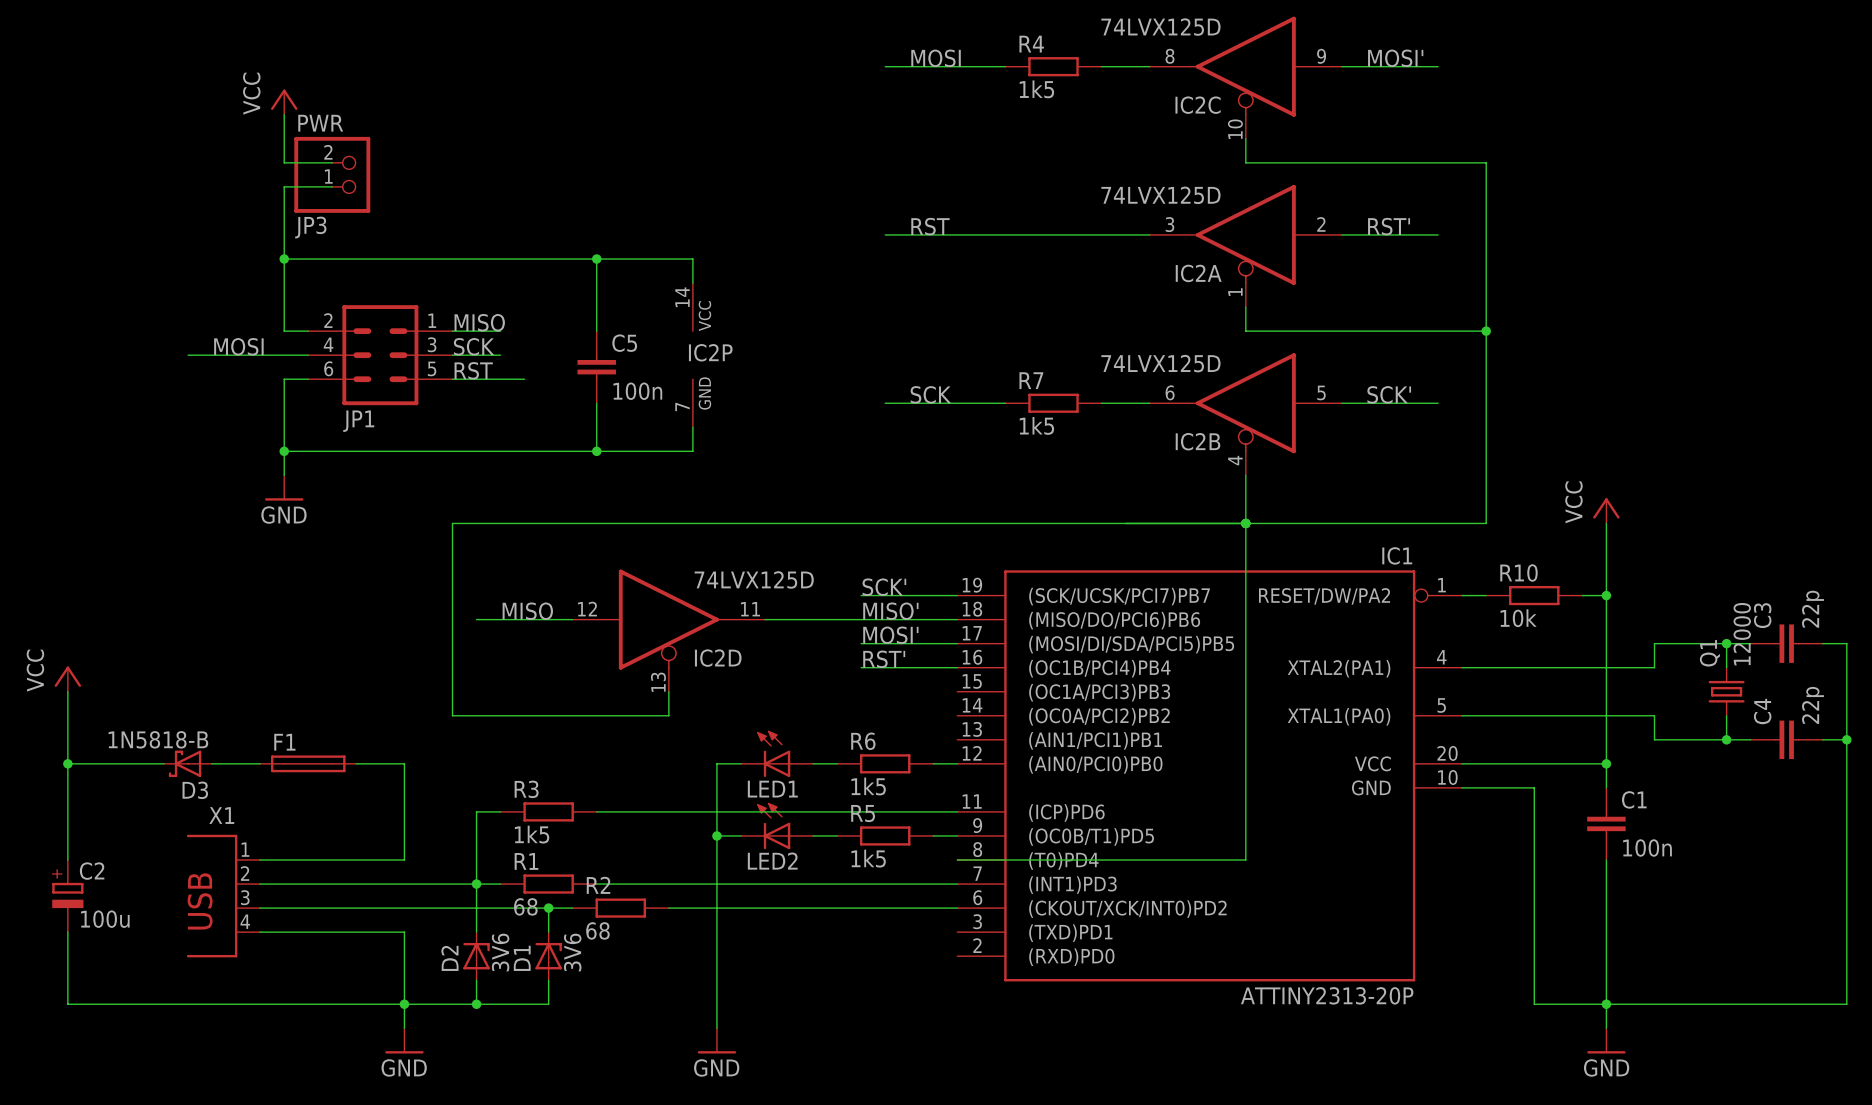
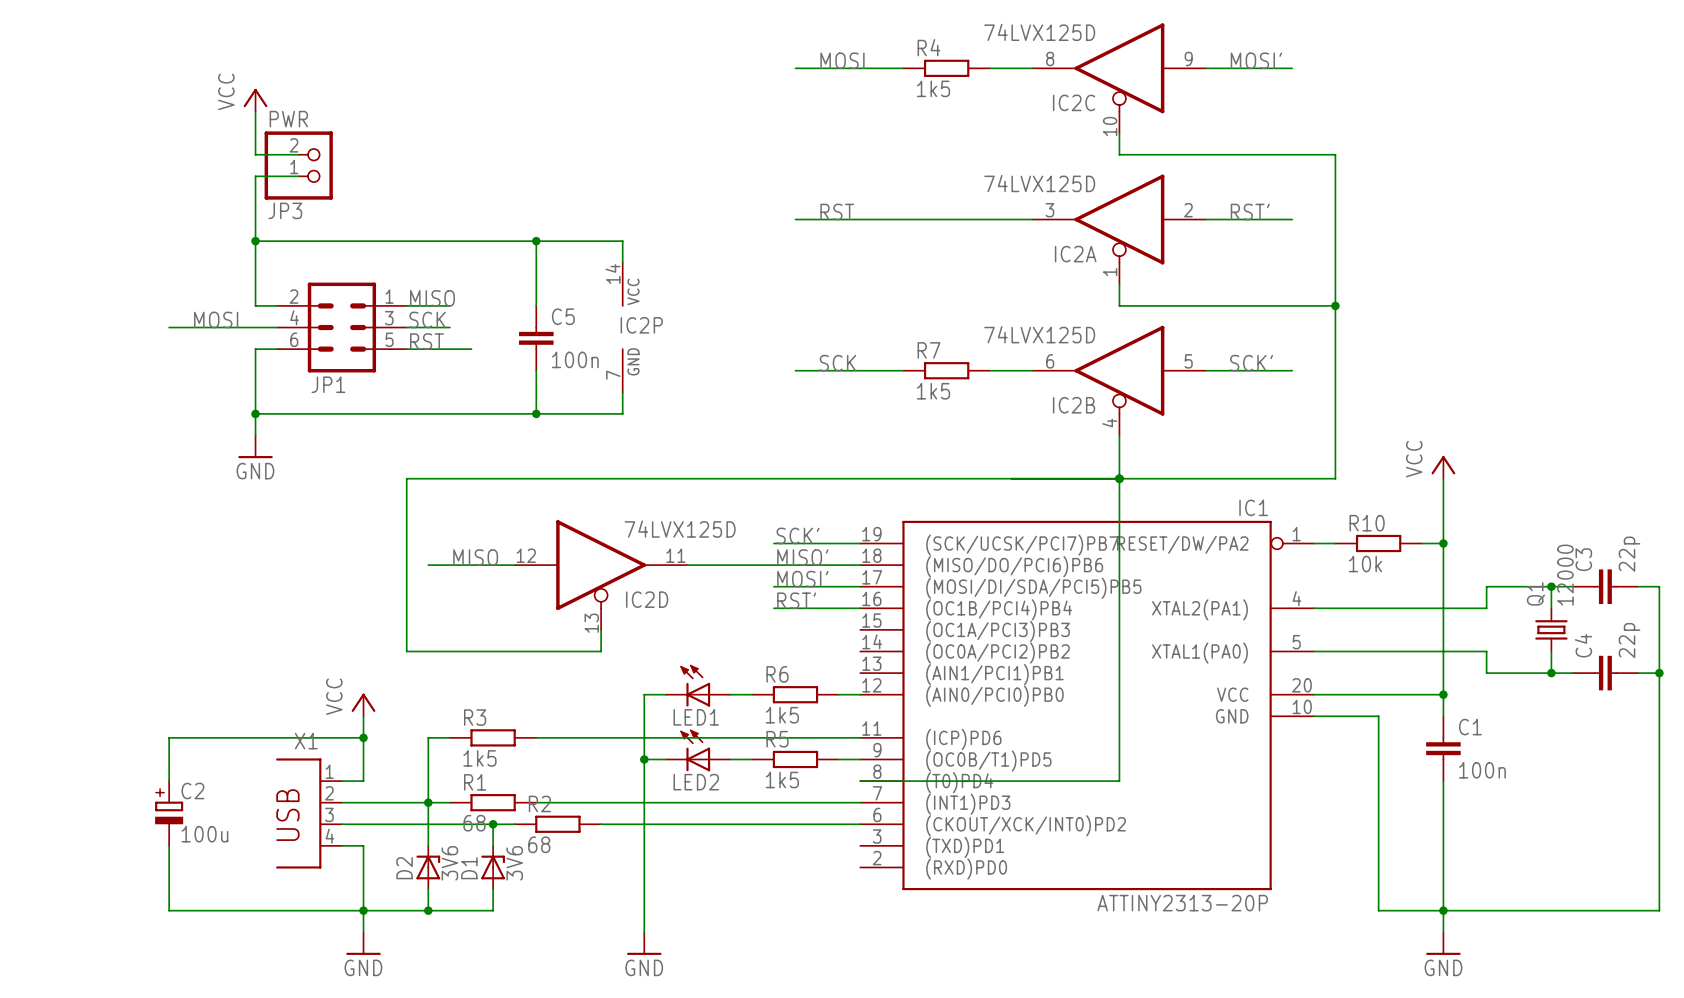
power symbol: VCC (67, 679) -> none
wire: (67, 691) (67, 860) -> none
wire: (67, 763) (164, 763) -> none
junction: (67, 763) -> none
D3: 1N5818-B (188, 763) -> none
wire: (212, 763) (260, 763) -> none
F1: (308, 763) -> none
wire: (356, 763) (404, 763) (404, 787) -> none
power symbol: none -> VCC (363, 704)
wire: none -> (363, 737) (169, 737) (169, 781)
junction: none -> (363, 737)
wire: (260, 860) (380, 860) -> none
wire: (260, 884) (380, 884) -> none
C2 position: (67, 896) -> (169, 813)
X1 position: (223, 896) -> (308, 813)
wire: (260, 908) (380, 908) -> none
wire: (67, 932) (67, 1004) (188, 1004) -> (169, 845) (169, 910)
wire: (260, 932) (380, 932) -> none

